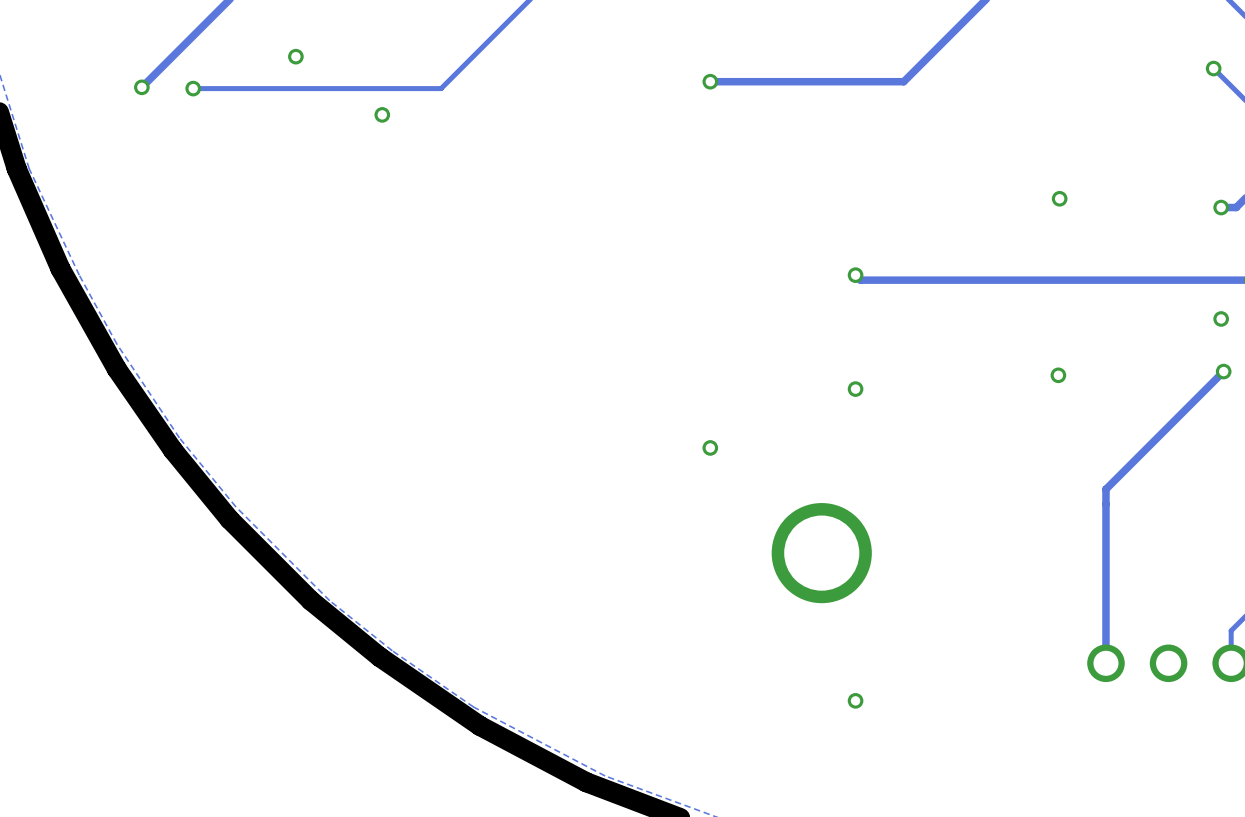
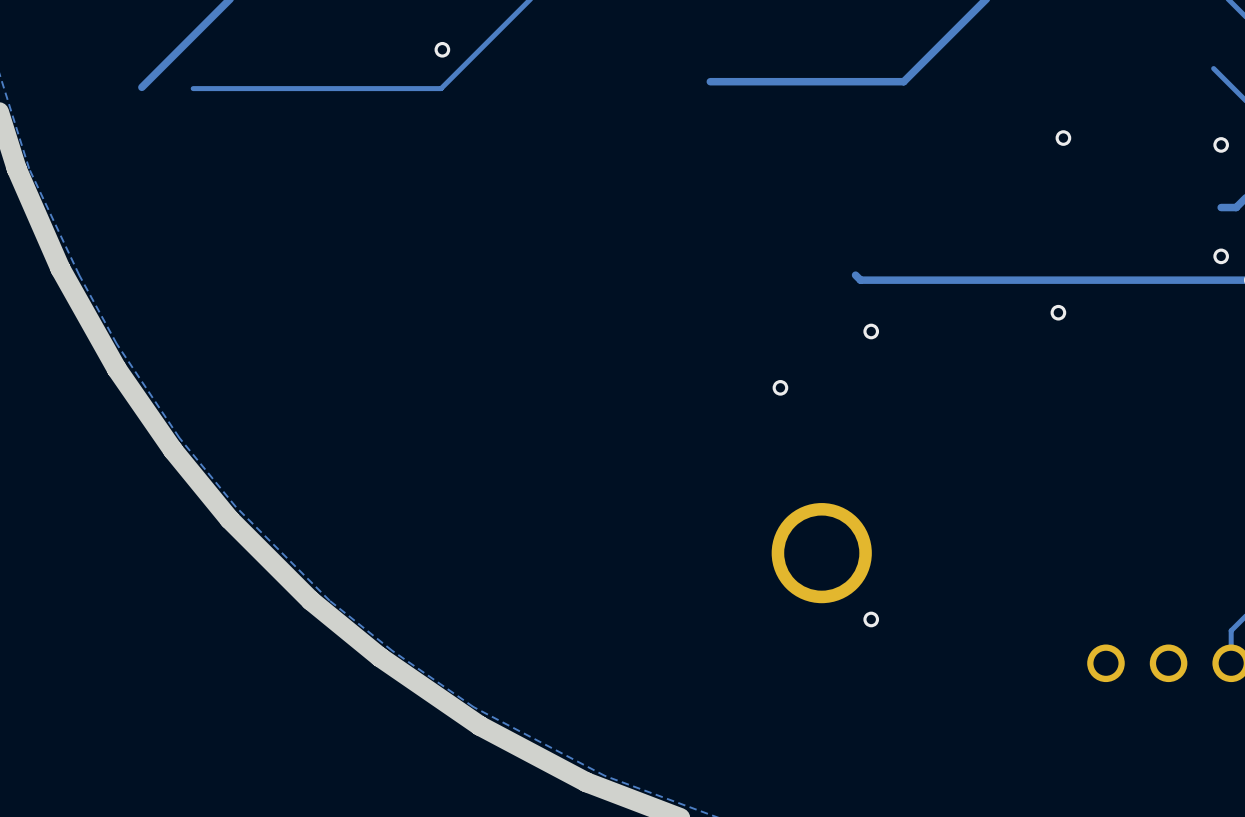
via: none -> (442, 49)
via: (295, 56) -> none
via: (1213, 68) -> none
via: (710, 81) -> none
via: (141, 87) -> none
via: (193, 88) -> none
via: (382, 114) -> none
via: none -> (1063, 138)
via: none -> (1221, 144)
via: (1059, 198) -> none
via: (1221, 207) -> none
via: none -> (1221, 256)
via: (855, 275) -> none
via: none -> (1058, 312)
via: (1221, 318) -> none
via: none -> (871, 331)
track: (1223, 371) (1105, 489) (1105, 663) -> none
via: (1223, 371) -> none
via: (1058, 375) -> none
via: none -> (780, 387)
via: (855, 389) -> none
via: (710, 447) -> none
via position: (855, 700) -> (871, 619)

